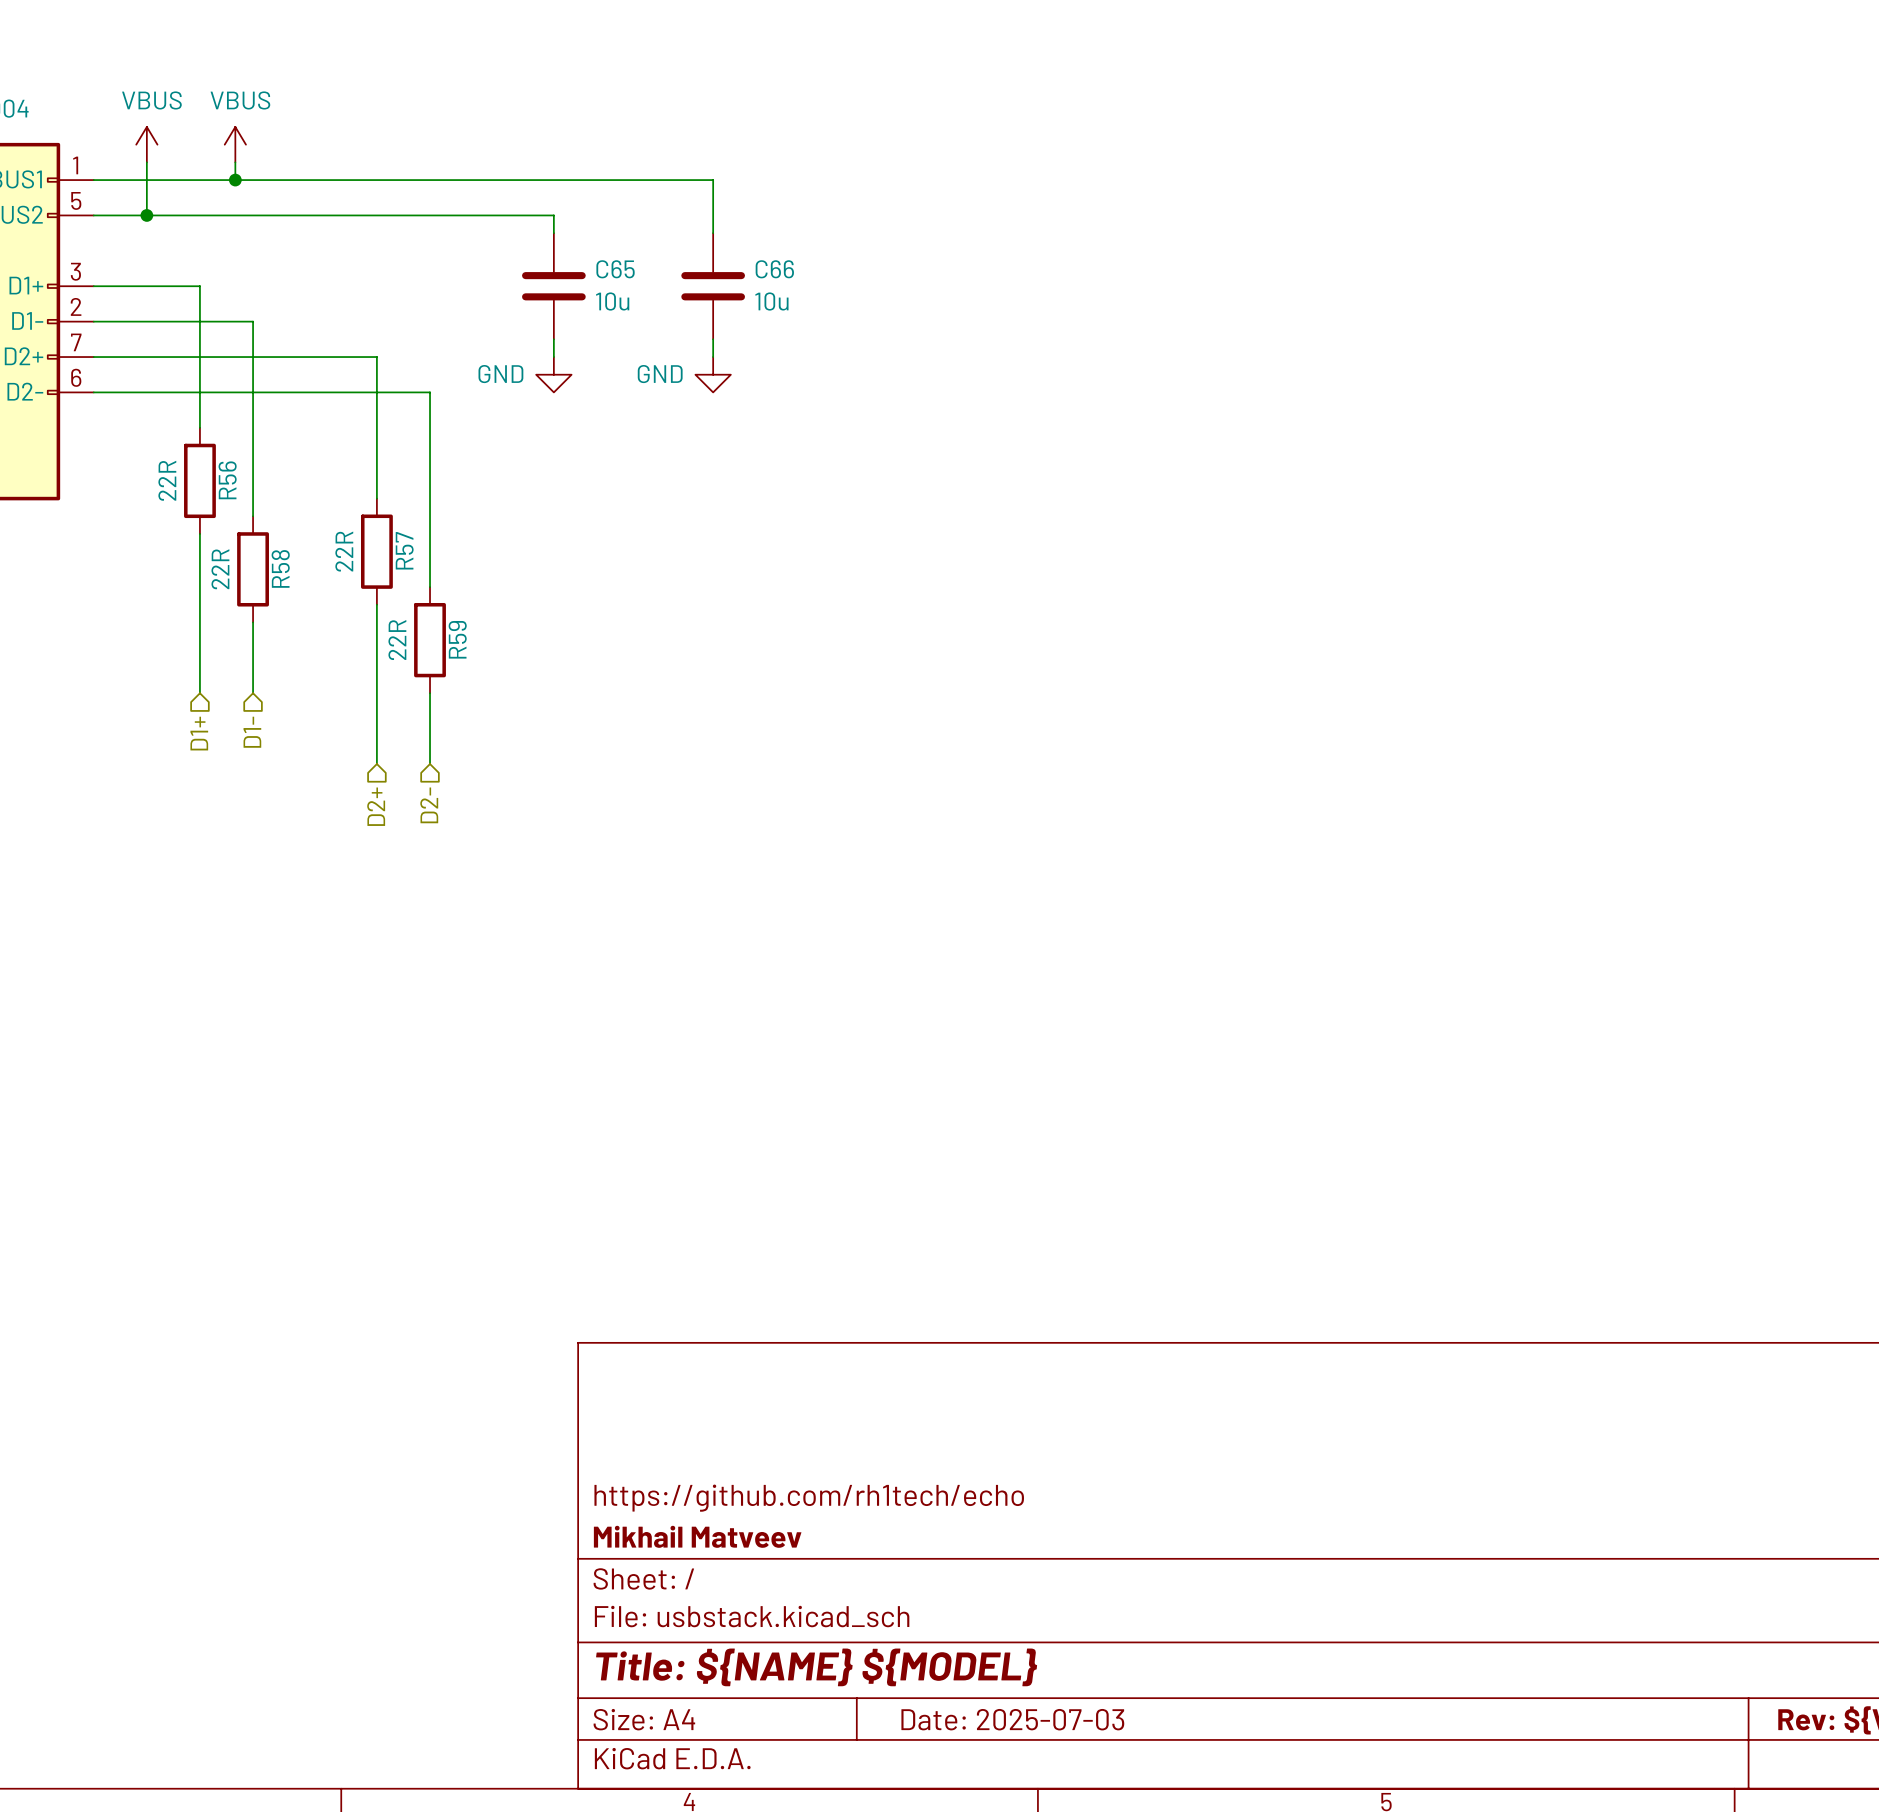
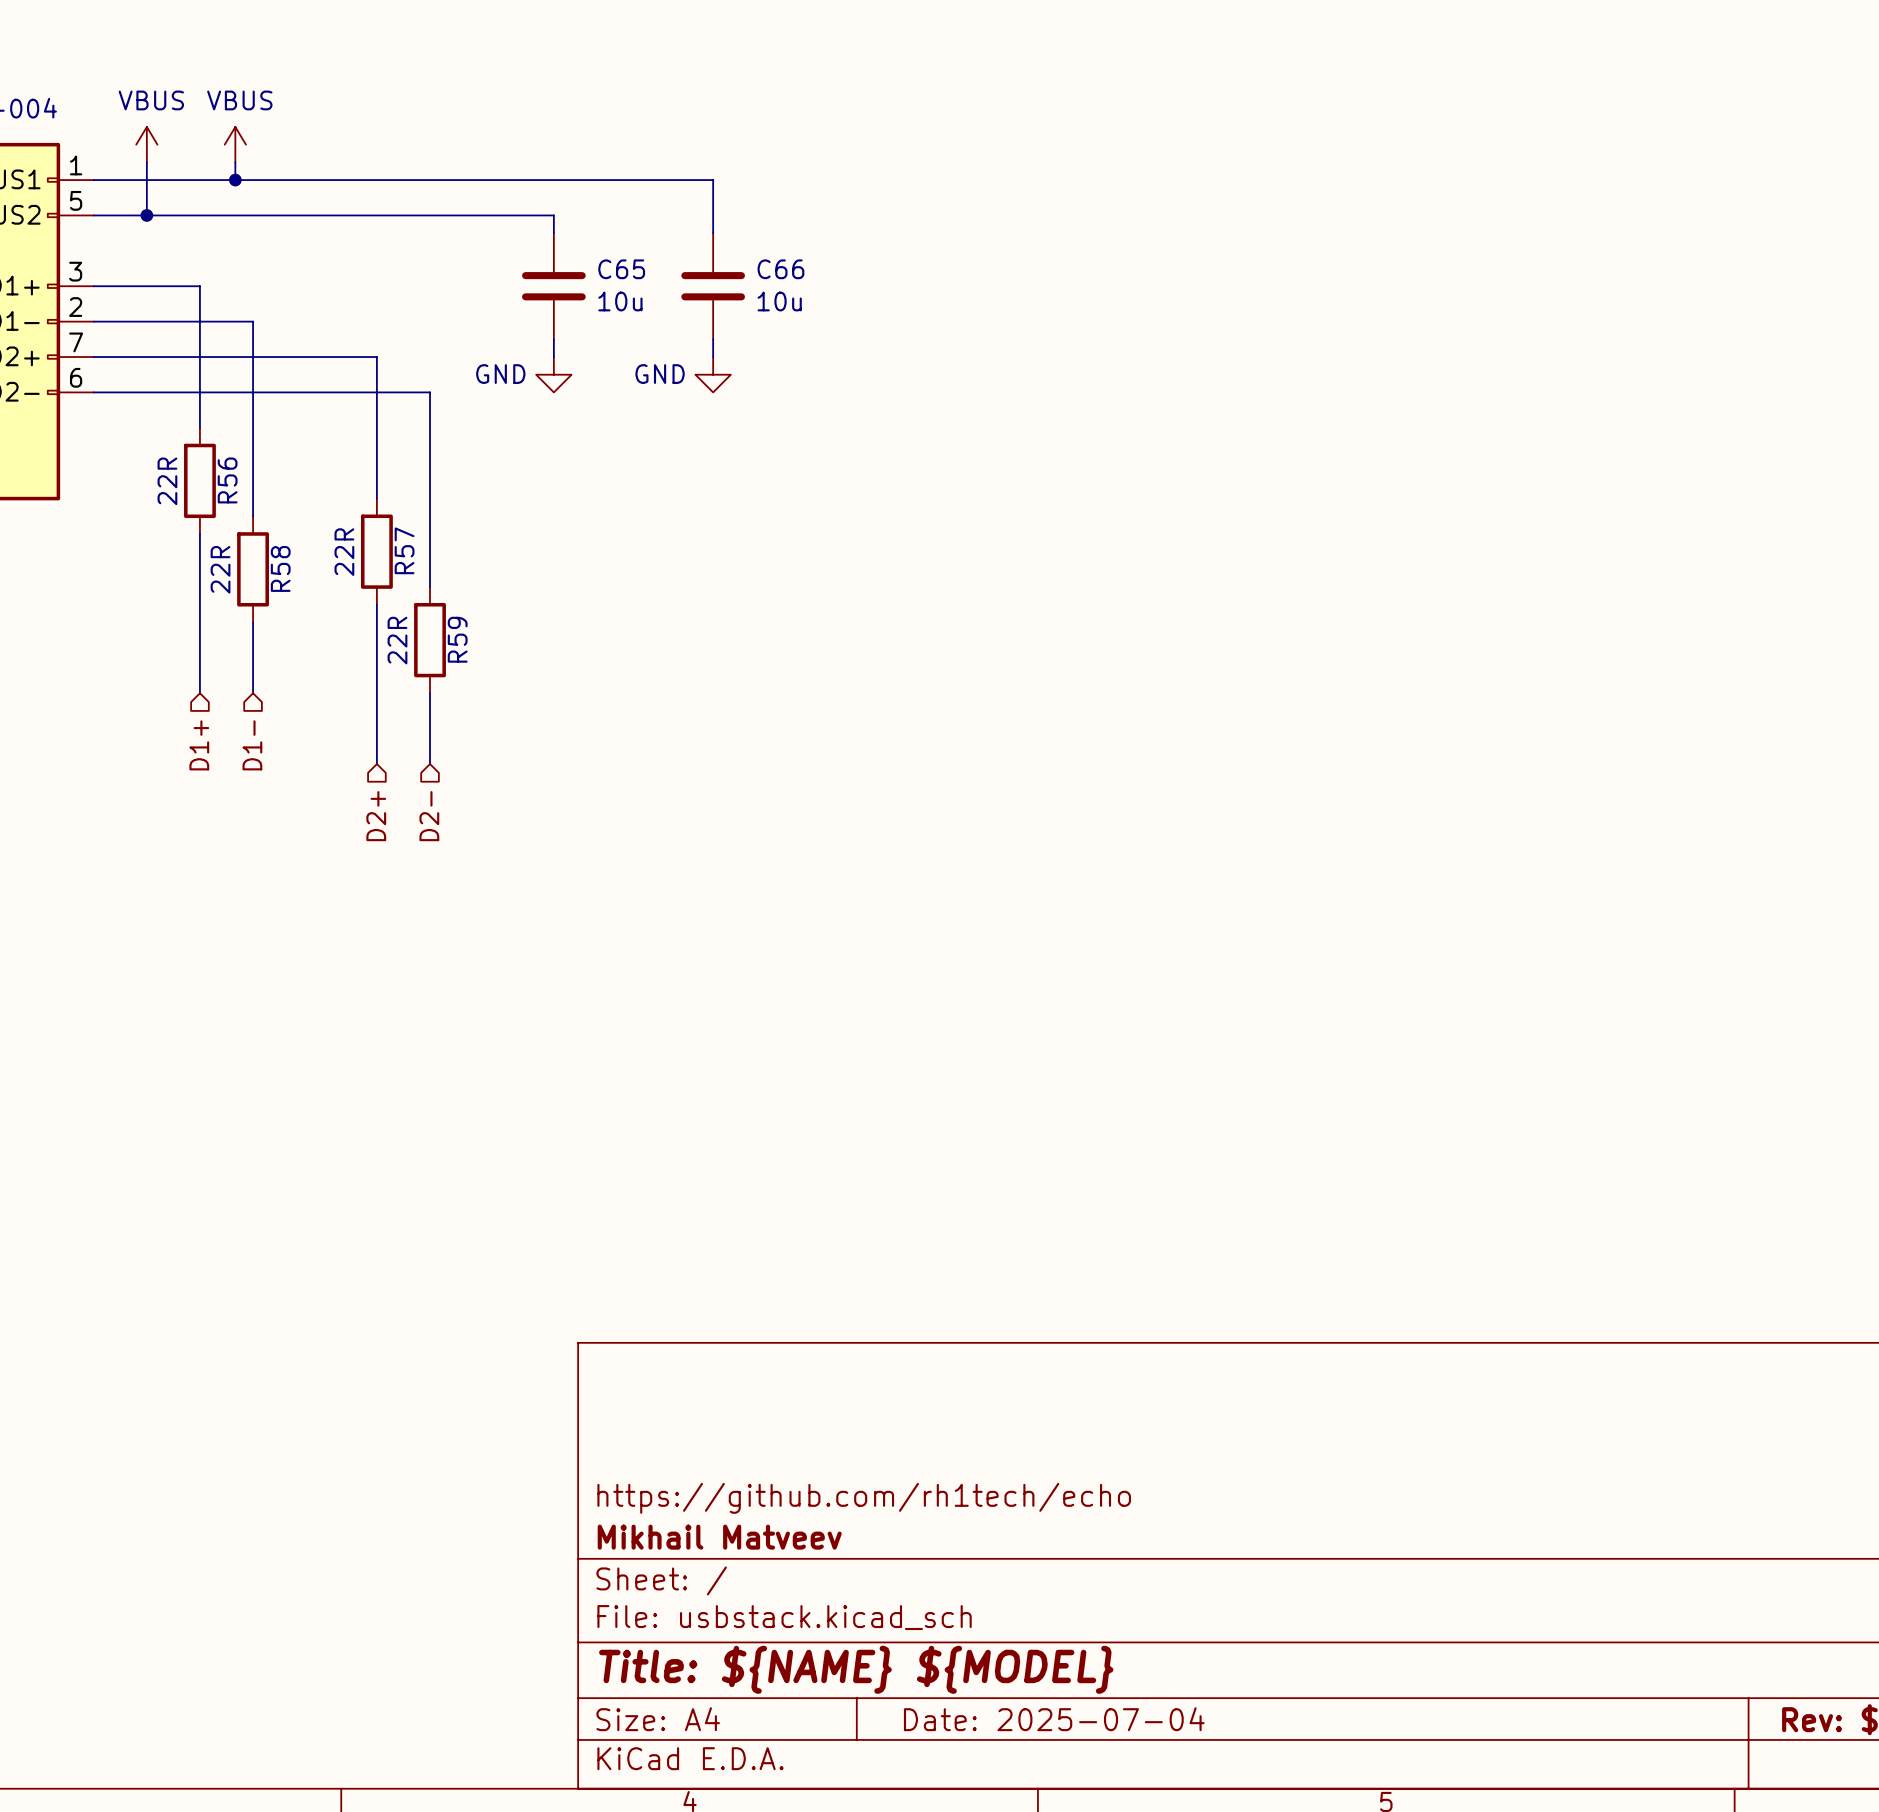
title block: Date: 2025-07-03 (1012, 1719) -> Date: 2025-07-04 (1054, 1719)

